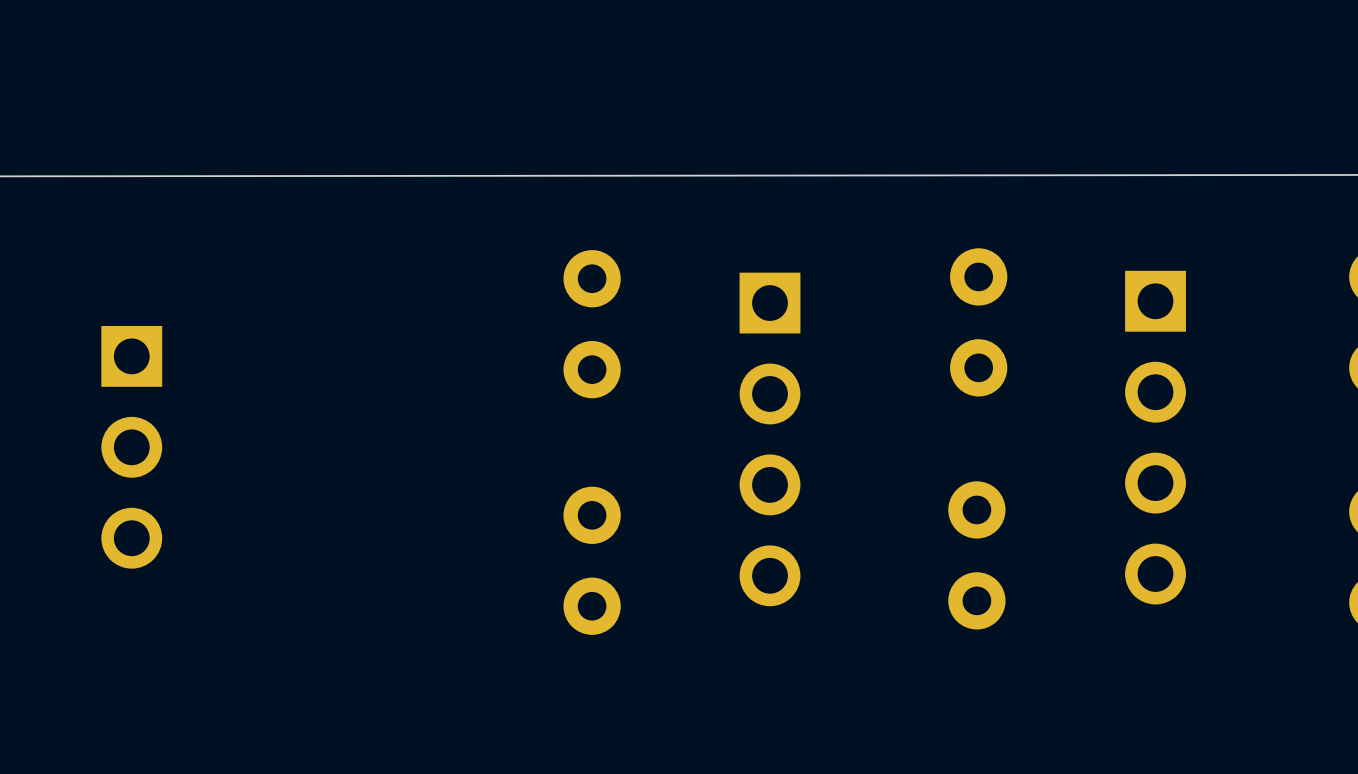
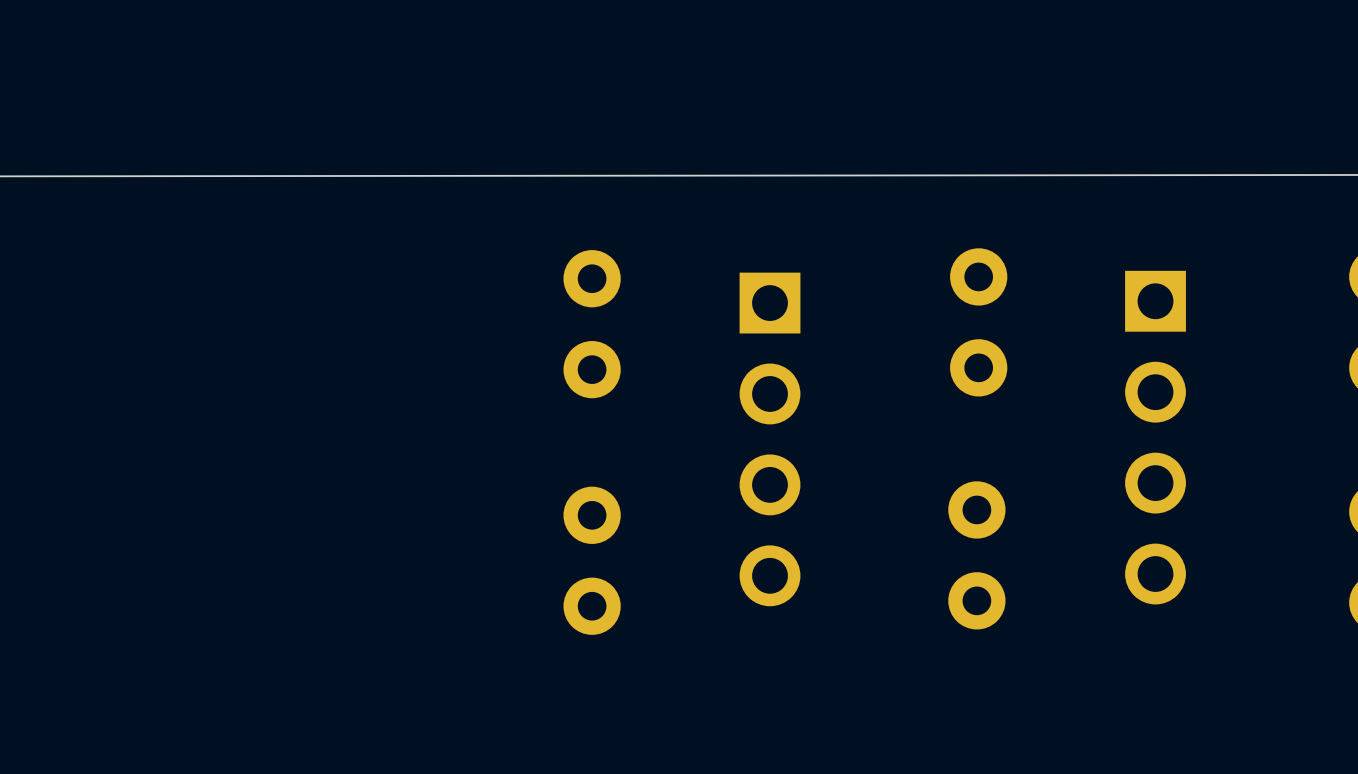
part: (131, 447) -> none

